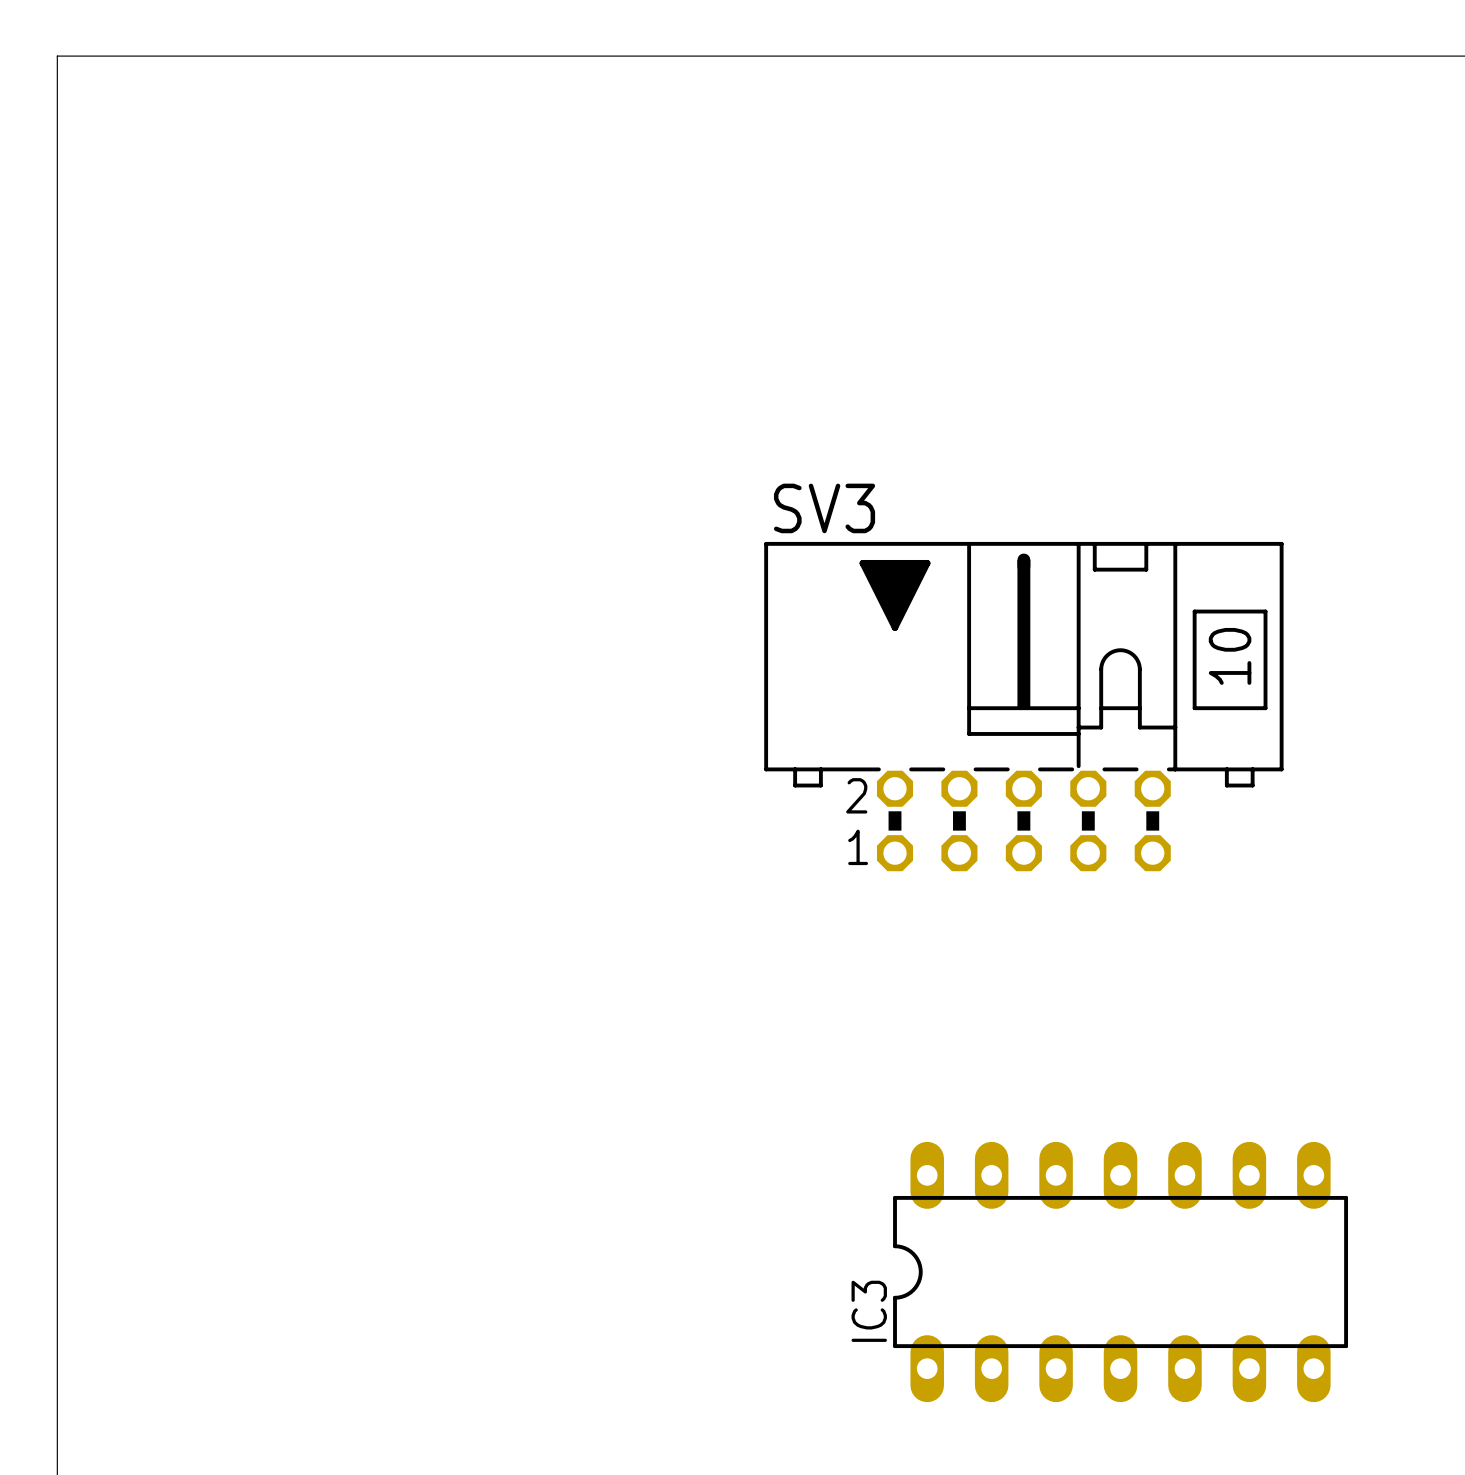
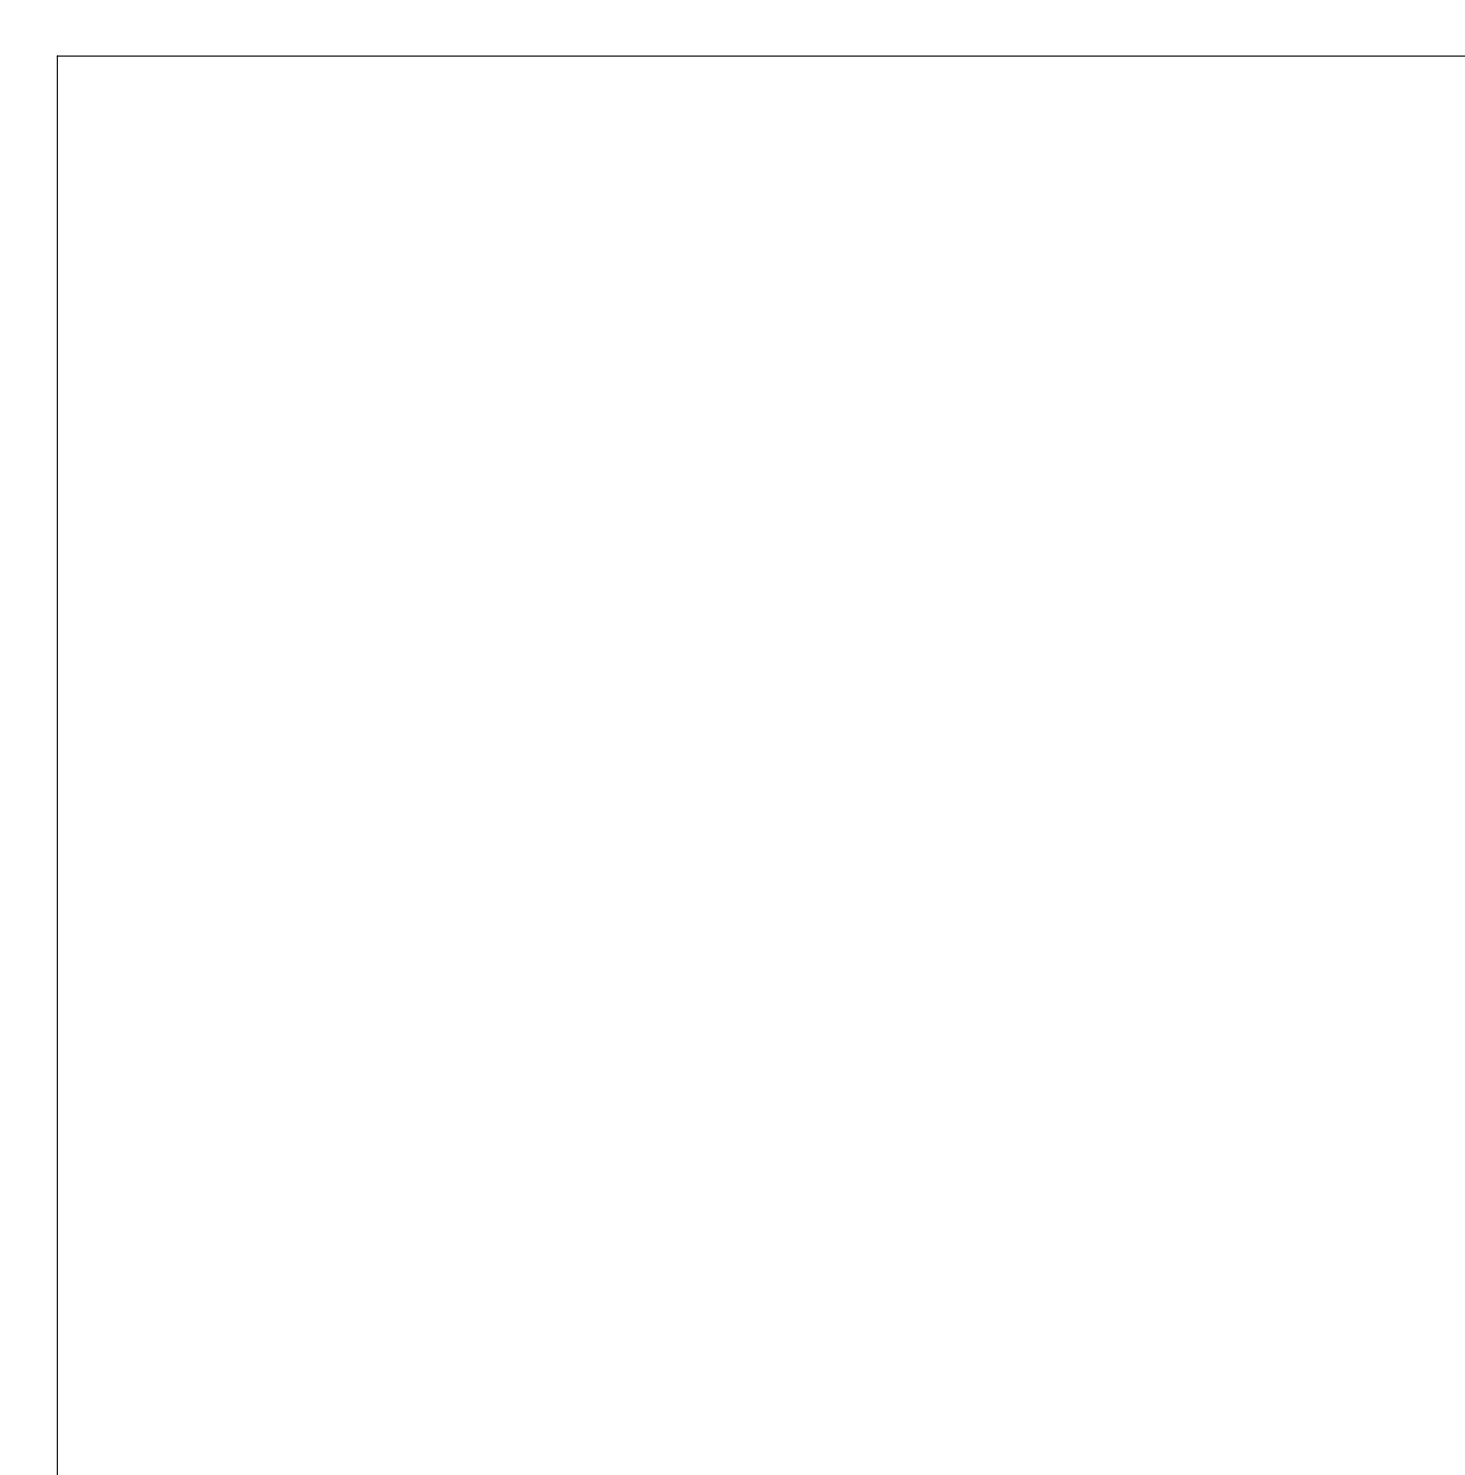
SV3: (1023, 706) -> none
IC3: (1120, 1272) -> none

